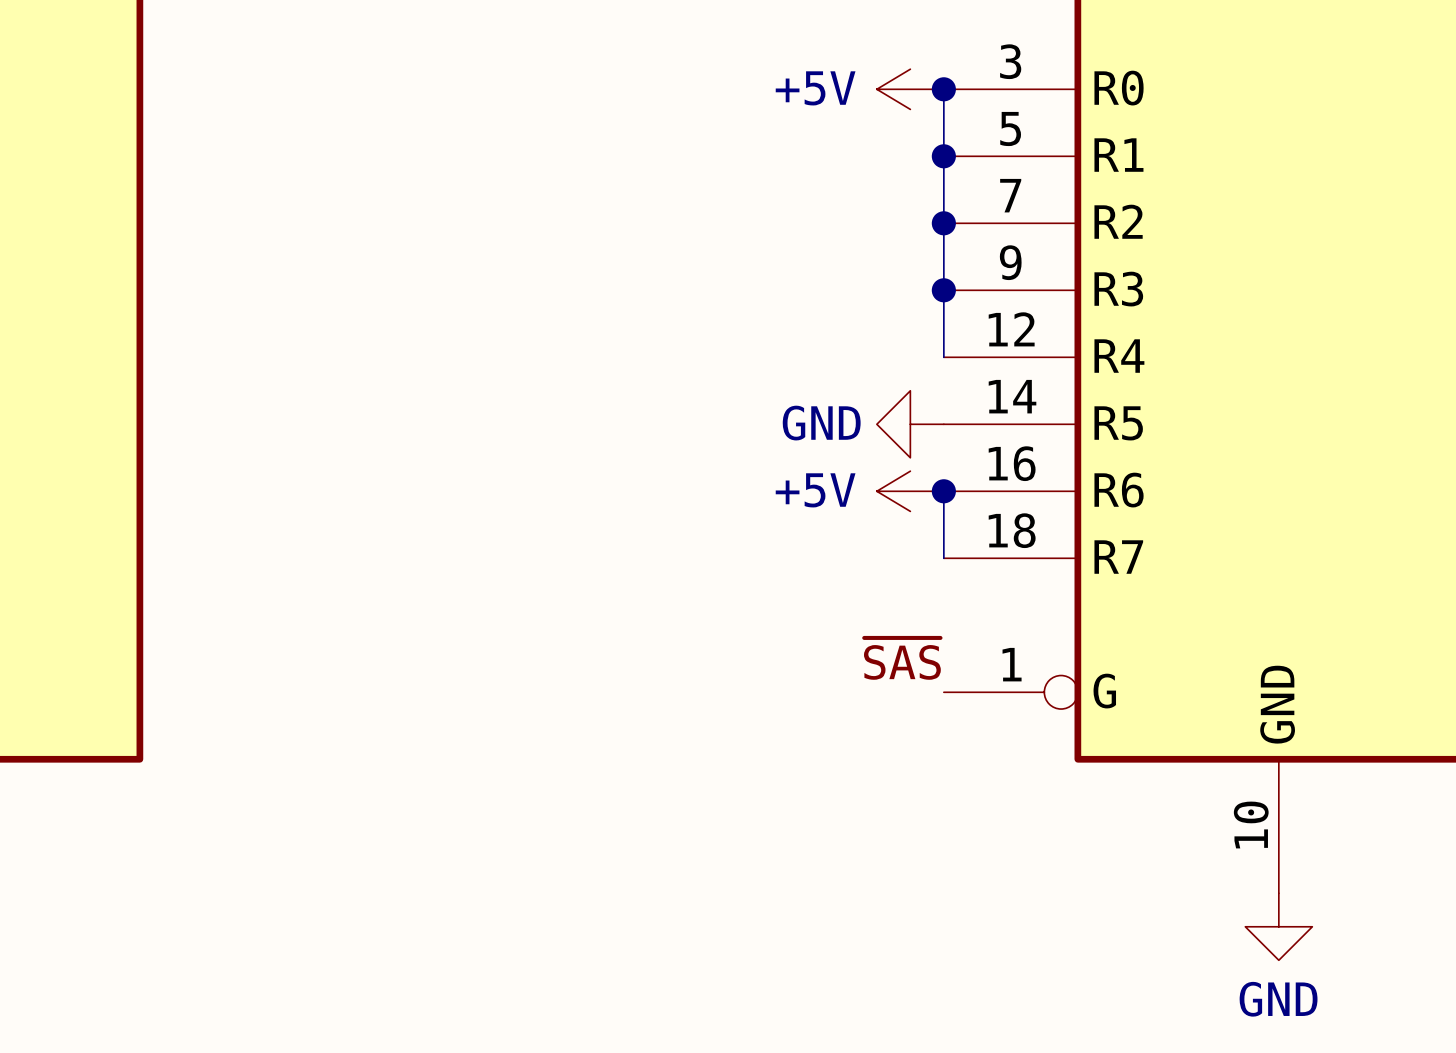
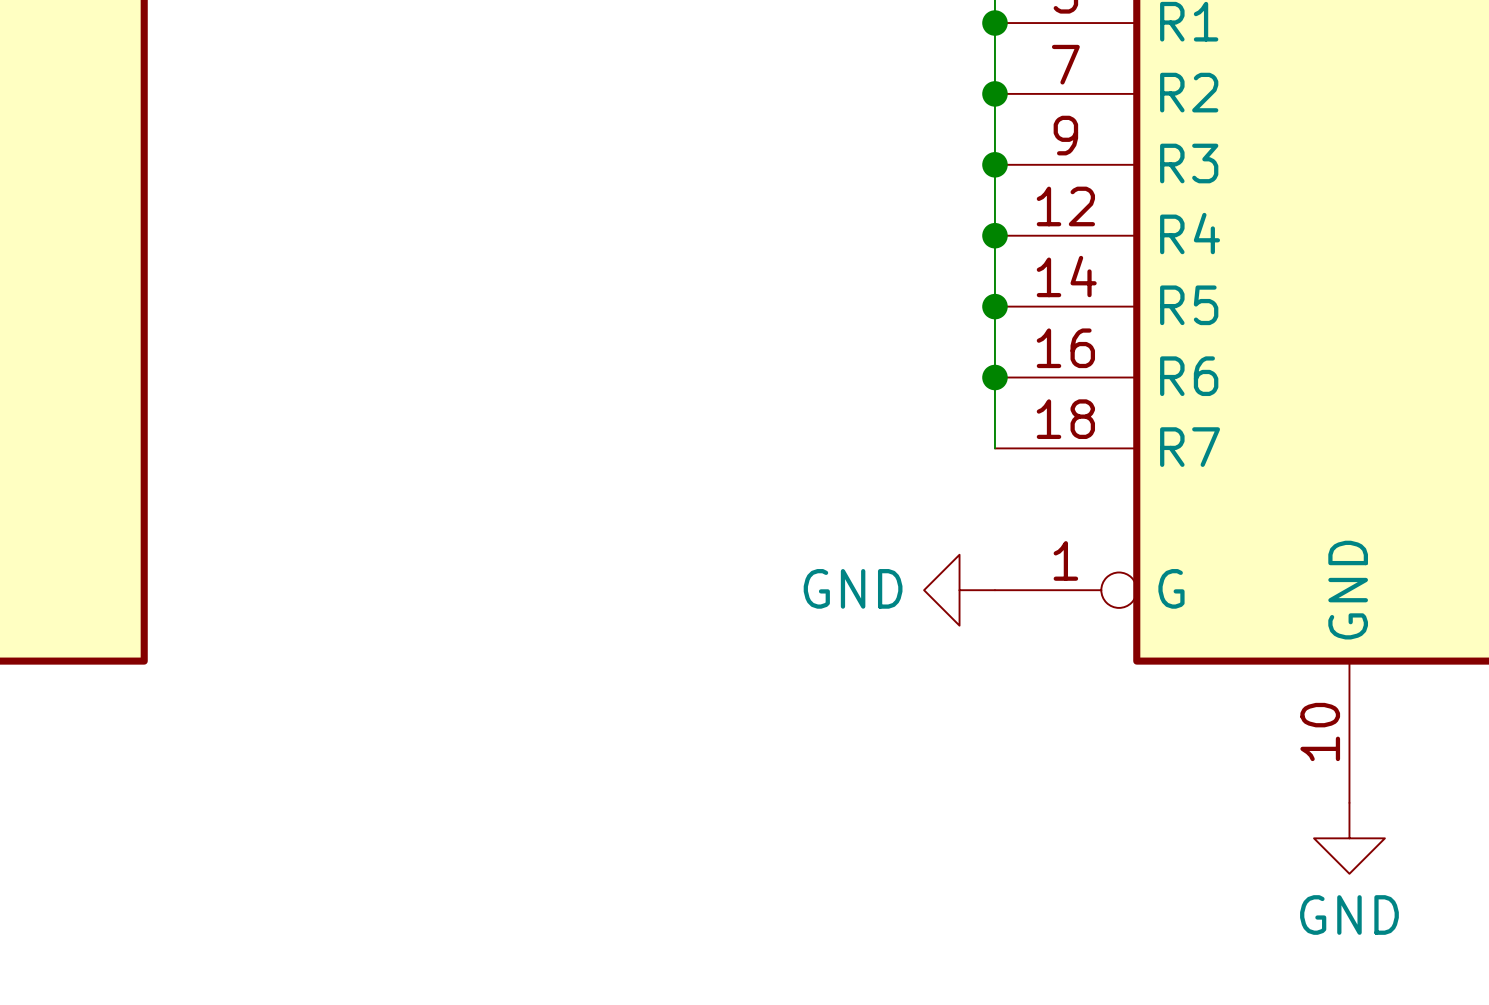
wire: none -> (994, 235) (994, 377)
junction: none -> (994, 235)
power symbol position: GND (910, 424) -> GND (959, 590)
junction: none -> (994, 306)
power symbol: +5V (910, 491) -> none
label: ~{SAS} (902, 658) -> none

